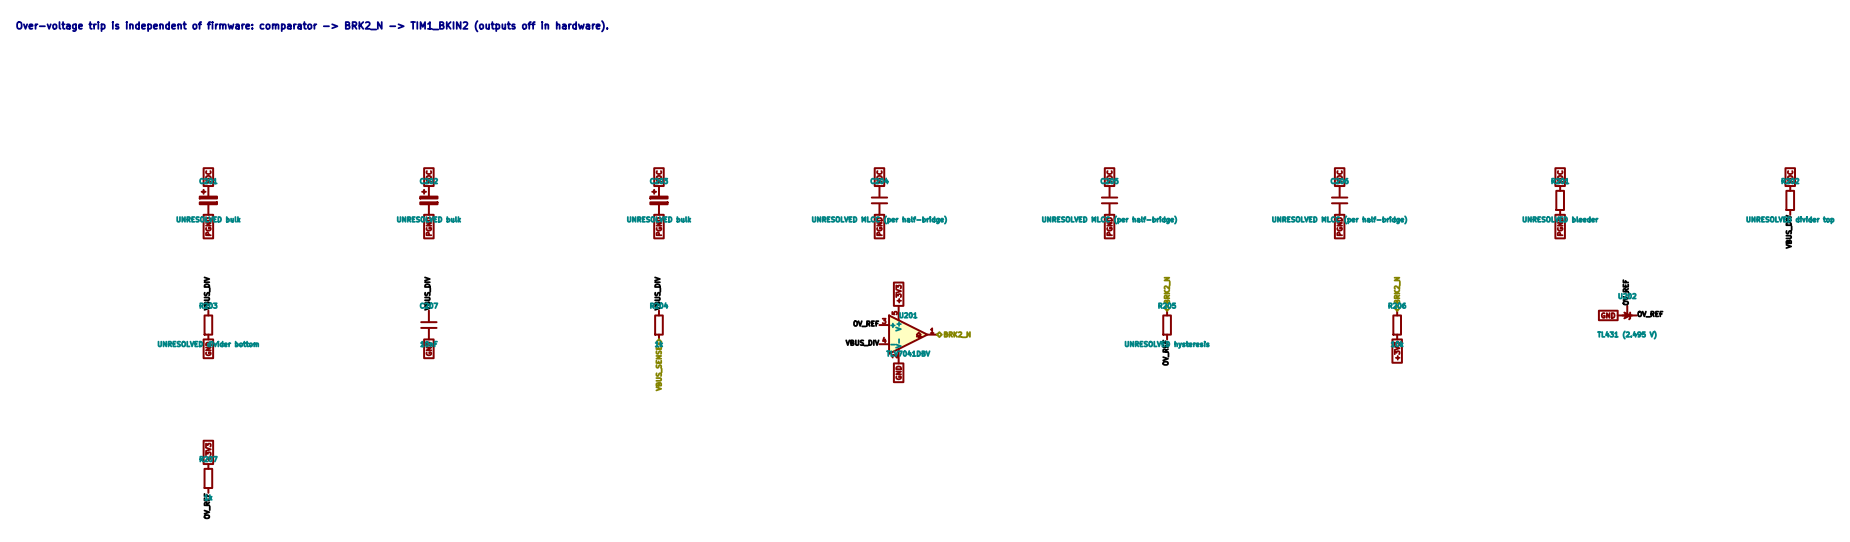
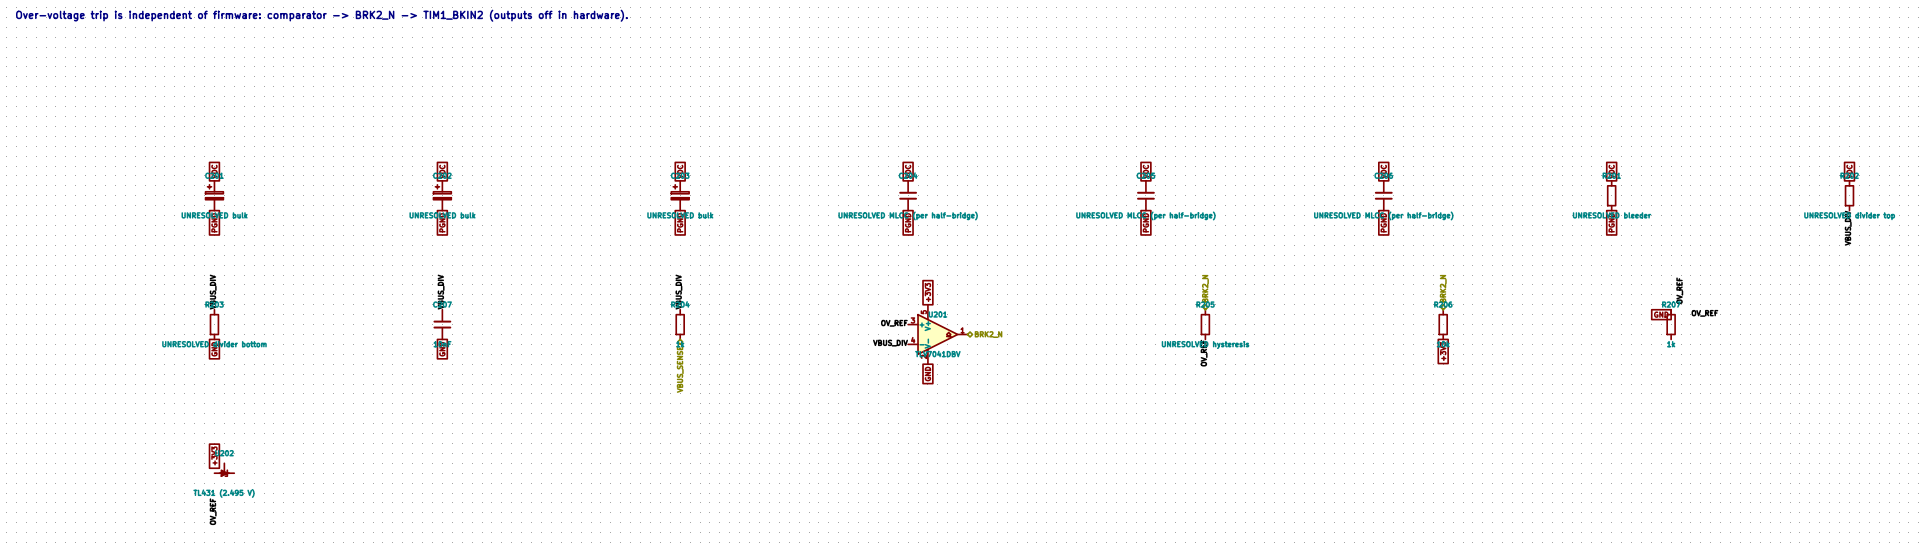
part symbol: [1617, 305, 1637, 320] -> [214, 463, 235, 477]
part position: (208, 478) -> (1671, 324)

